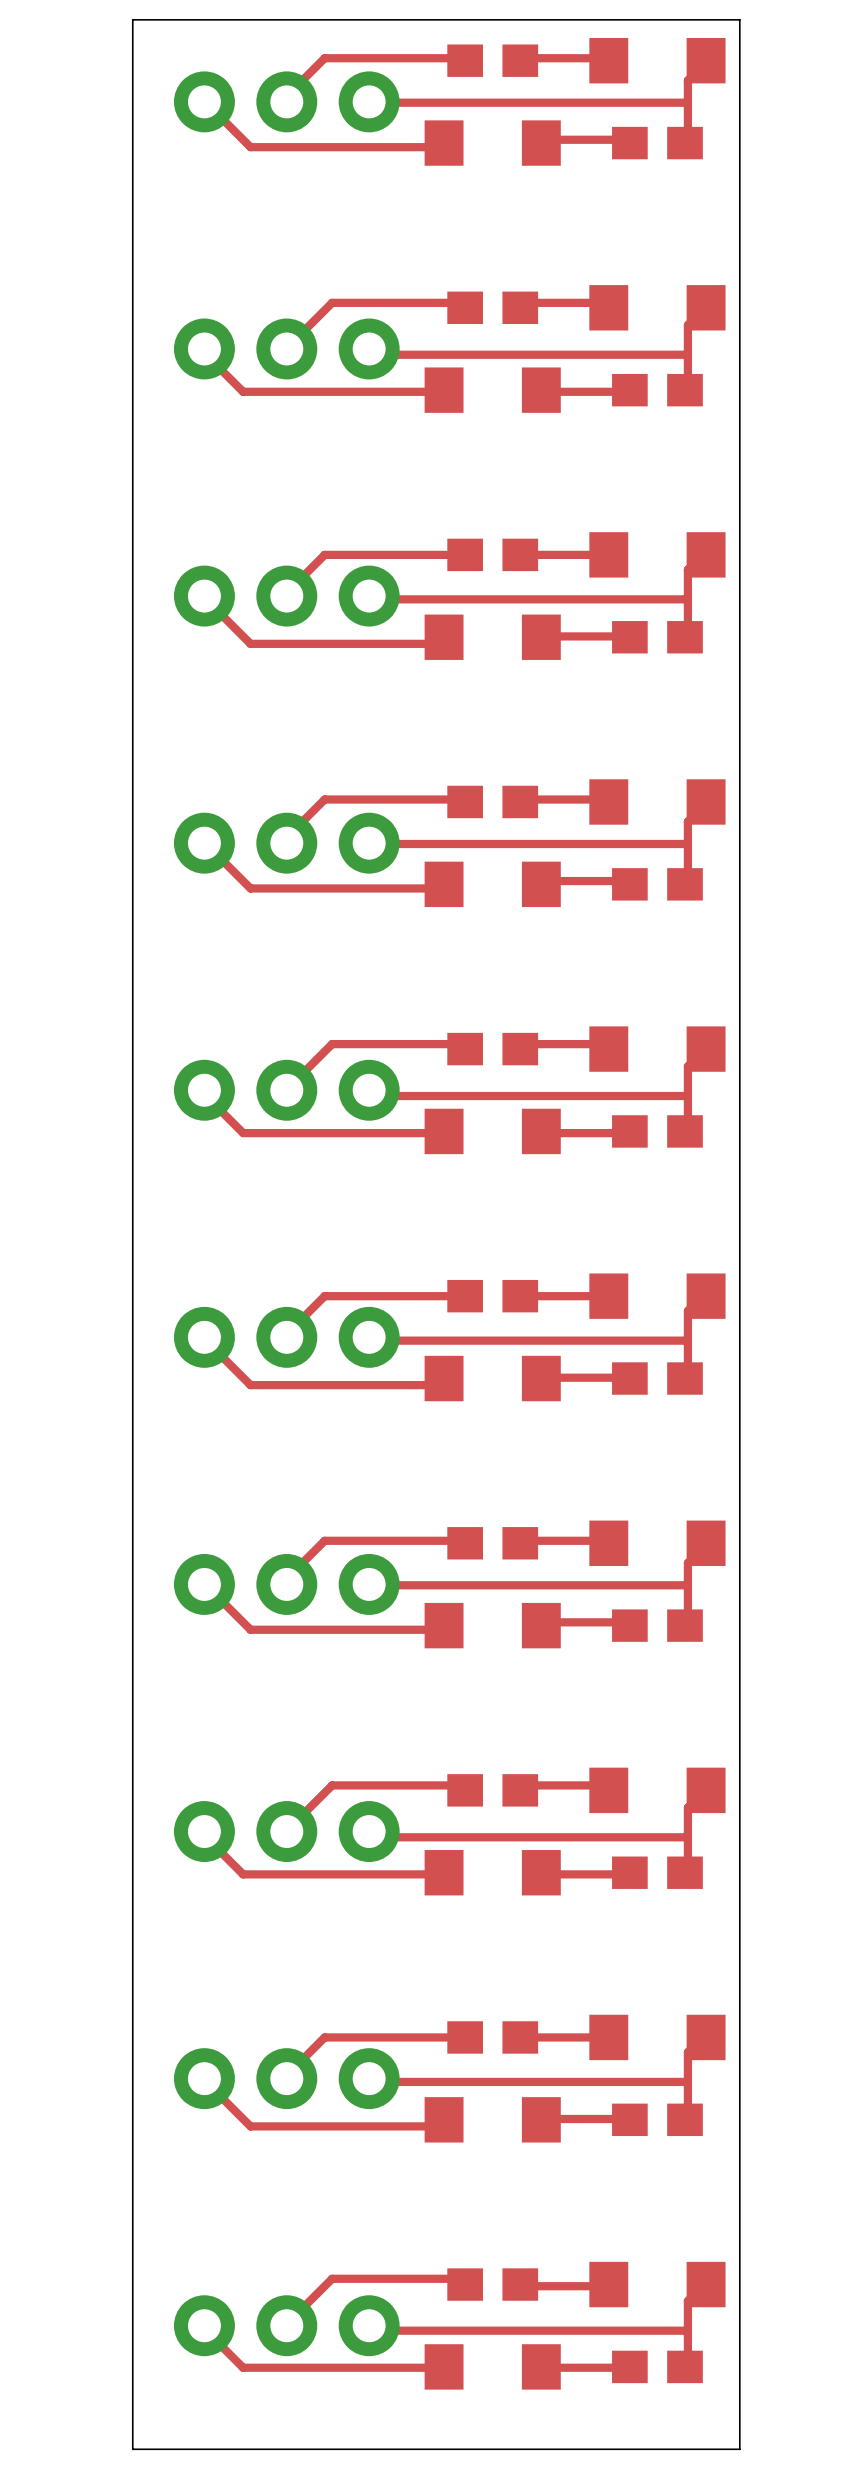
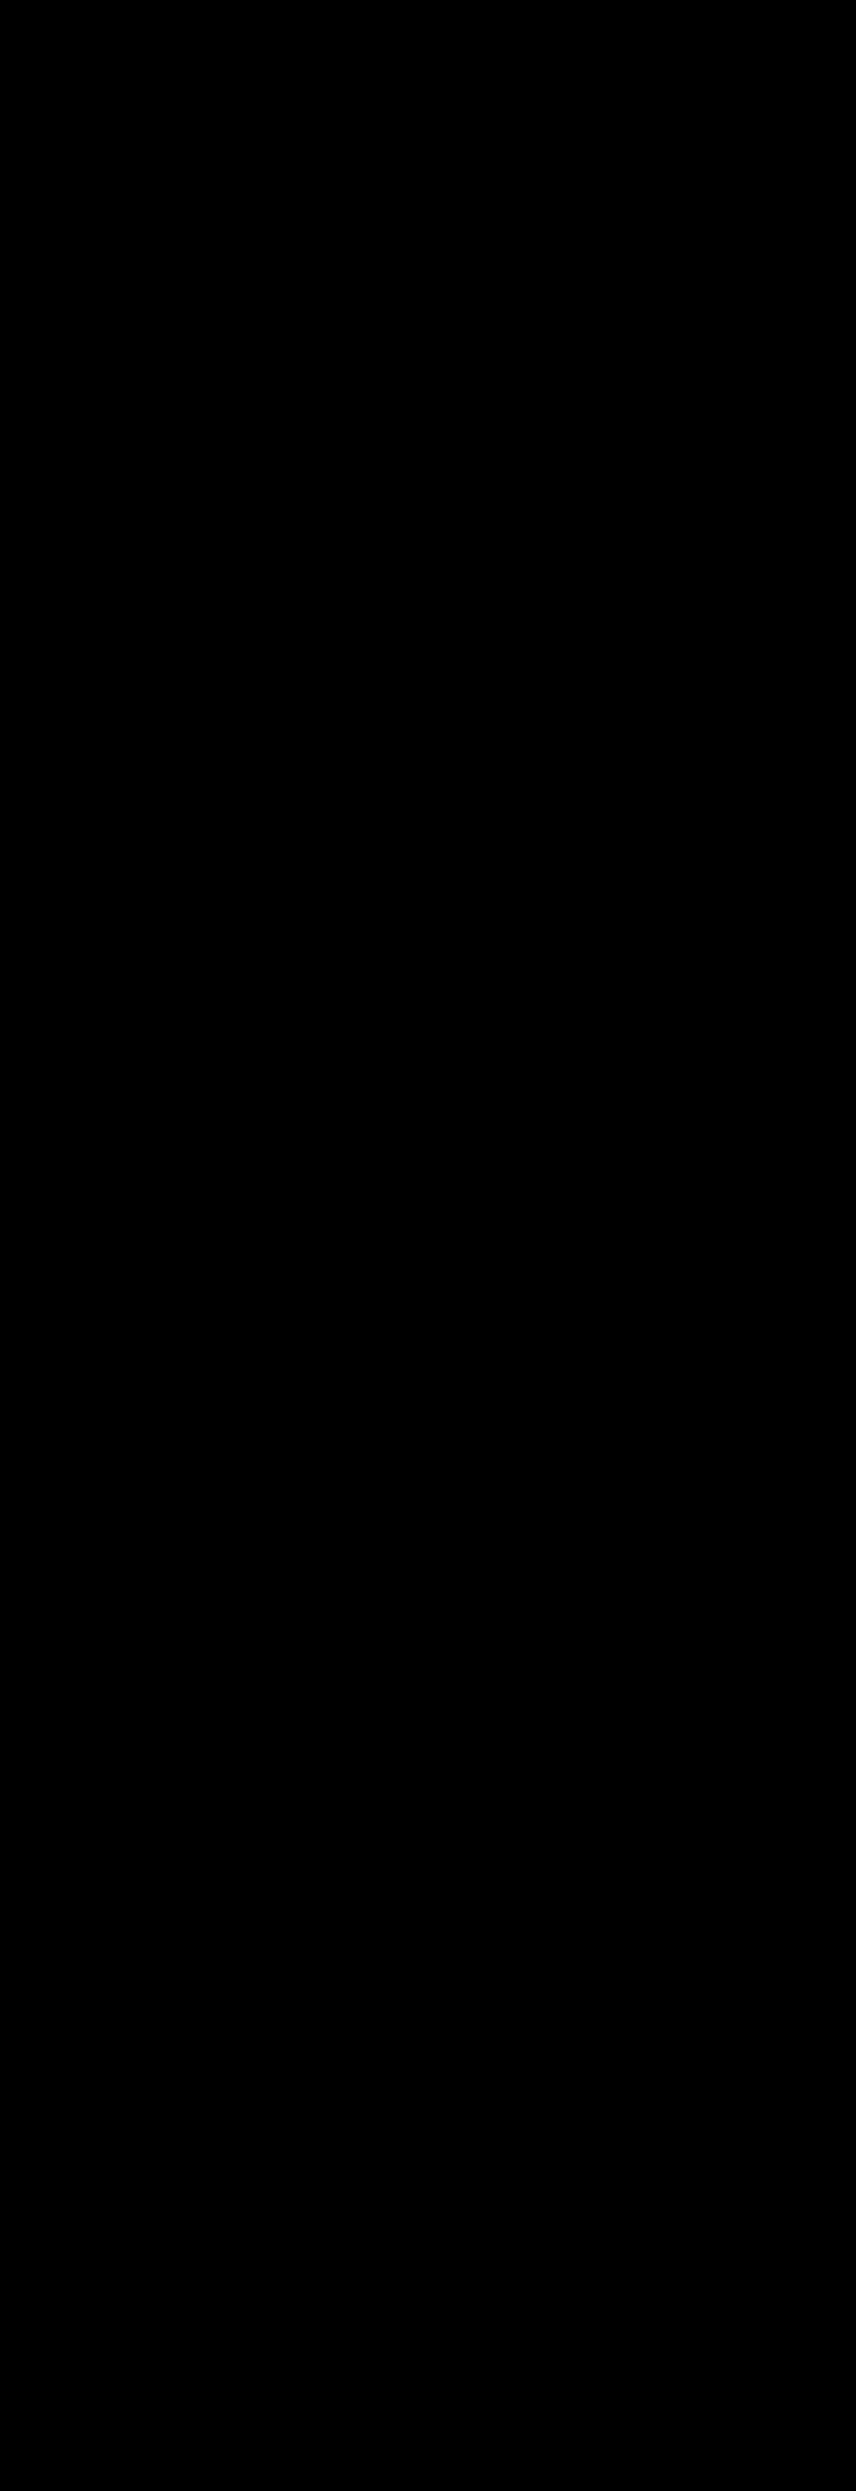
board edge: (739, 19) (132, 19) (132, 2449) (739, 2449) (739, 19) -> none
top track: (465, 60) (458, 58) (324, 58) (287, 95) (286, 101) -> none
part: (492, 60) -> none
top track: (608, 60) (606, 58) (524, 58) (520, 60) -> none
part: (657, 60) -> none
top track: (706, 60) (687, 80) (687, 139) (685, 143) -> none
top track: (204, 101) (250, 147) (443, 147) (444, 143) -> none
part: (286, 101) -> none
top track: (369, 101) (687, 102) -> none
part: (492, 143) -> none
top track: (629, 143) (628, 139) (547, 139) (541, 143) -> none
part: (657, 143) -> none
top track: (465, 307) (458, 302) (332, 302) (286, 348) -> none
part: (492, 307) -> none
top track: (608, 307) (606, 302) (524, 302) (520, 307) -> none
part: (657, 307) -> none
top track: (706, 307) (687, 325) (687, 384) (685, 390) -> none
top track: (204, 348) (206, 354) (243, 391) (443, 391) (444, 390) -> none
part: (286, 348) -> none
top track: (369, 348) (369, 354) (687, 354) -> none
part: (492, 390) -> none
top track: (629, 390) (628, 391) (547, 391) (541, 390) -> none
part: (657, 390) -> none
top track: (465, 554) (324, 554) (287, 591) (286, 596) -> none
part: (492, 554) -> none
top track: (608, 554) (520, 554) -> none
part: (657, 554) -> none
top track: (706, 554) (702, 554) (687, 569) (687, 636) (685, 637) -> none
top track: (204, 596) (250, 643) (443, 643) (444, 637) -> none
part: (286, 596) -> none
top track: (369, 596) (369, 599) (687, 599) -> none
part: (492, 637) -> none
top track: (629, 637) (541, 637) -> none
part: (657, 637) -> none
top track: (465, 801) (458, 799) (324, 799) (287, 836) (286, 843) -> none
part: (492, 801) -> none
top track: (608, 801) (606, 799) (524, 799) (520, 801) -> none
part: (657, 801) -> none
top track: (706, 801) (687, 821) (687, 881) (685, 884) -> none
top track: (204, 843) (250, 888) (443, 888) (444, 884) -> none
part: (286, 843) -> none
top track: (369, 843) (687, 843) -> none
part: (492, 884) -> none
top track: (629, 884) (628, 881) (547, 881) (541, 884) -> none
part: (657, 884) -> none
top track: (465, 1049) (458, 1044) (332, 1044) (286, 1090) -> none
part: (492, 1049) -> none
top track: (608, 1049) (606, 1044) (524, 1044) (520, 1049) -> none
part: (657, 1049) -> none
top track: (706, 1049) (687, 1066) (687, 1125) (685, 1131) -> none
top track: (204, 1090) (206, 1096) (243, 1133) (443, 1133) (444, 1131) -> none
part: (286, 1090) -> none
top track: (369, 1090) (369, 1096) (687, 1096) -> none
part: (492, 1131) -> none
top track: (629, 1131) (628, 1133) (547, 1133) (541, 1131) -> none
part: (657, 1131) -> none
top track: (465, 1296) (324, 1296) (287, 1333) (286, 1337) -> none
part: (492, 1296) -> none
top track: (608, 1296) (520, 1296) -> none
part: (657, 1296) -> none
top track: (706, 1296) (702, 1296) (687, 1310) (687, 1377) (685, 1378) -> none
top track: (204, 1337) (250, 1385) (443, 1385) (444, 1378) -> none
part: (286, 1337) -> none
top track: (369, 1337) (369, 1340) (687, 1340) -> none
part: (492, 1378) -> none
top track: (629, 1378) (541, 1378) -> none
part: (657, 1378) -> none
top track: (465, 1543) (458, 1540) (324, 1540) (287, 1577) (286, 1584) -> none
part: (492, 1543) -> none
top track: (608, 1543) (606, 1540) (524, 1540) (520, 1543) -> none
part: (657, 1543) -> none
top track: (706, 1543) (687, 1563) (687, 1622) (685, 1625) -> none
top track: (204, 1584) (250, 1629) (443, 1629) (444, 1625) -> none
part: (286, 1584) -> none
top track: (369, 1584) (687, 1585) -> none
part: (492, 1625) -> none
top track: (629, 1625) (628, 1622) (547, 1622) (541, 1625) -> none
part: (657, 1625) -> none
top track: (465, 1790) (458, 1785) (332, 1785) (286, 1831) -> none
part: (492, 1790) -> none
top track: (608, 1790) (606, 1785) (524, 1785) (520, 1790) -> none
part: (657, 1790) -> none
top track: (706, 1790) (687, 1807) (687, 1866) (685, 1872) -> none
top track: (204, 1831) (206, 1837) (243, 1874) (443, 1874) (444, 1872) -> none
part: (286, 1831) -> none
top track: (369, 1831) (369, 1837) (687, 1837) -> none
part: (492, 1872) -> none
top track: (629, 1872) (628, 1874) (547, 1874) (541, 1872) -> none
part: (657, 1872) -> none
top track: (465, 2037) (324, 2037) (287, 2074) (286, 2078) -> none
part: (492, 2037) -> none
top track: (608, 2037) (520, 2037) -> none
part: (657, 2037) -> none
top track: (706, 2037) (702, 2037) (687, 2052) (687, 2118) (685, 2119) -> none
top track: (204, 2078) (250, 2126) (443, 2126) (444, 2119) -> none
part: (286, 2078) -> none
top track: (369, 2078) (369, 2081) (687, 2081) -> none
part: (492, 2119) -> none
top track: (629, 2119) (541, 2119) -> none
part: (657, 2119) -> none
top track: (465, 2284) (458, 2278) (332, 2278) (286, 2325) -> none
part: (492, 2284) -> none
top track: (608, 2284) (606, 2286) (524, 2286) (520, 2284) -> none
part: (657, 2284) -> none
top track: (706, 2284) (687, 2301) (687, 2360) (685, 2366) -> none
top track: (204, 2325) (206, 2330) (243, 2367) (444, 2366) -> none
part: (286, 2325) -> none
top track: (369, 2325) (369, 2330) (687, 2330) -> none
part: (492, 2366) -> none
top track: (629, 2366) (541, 2366) -> none
part: (657, 2366) -> none

